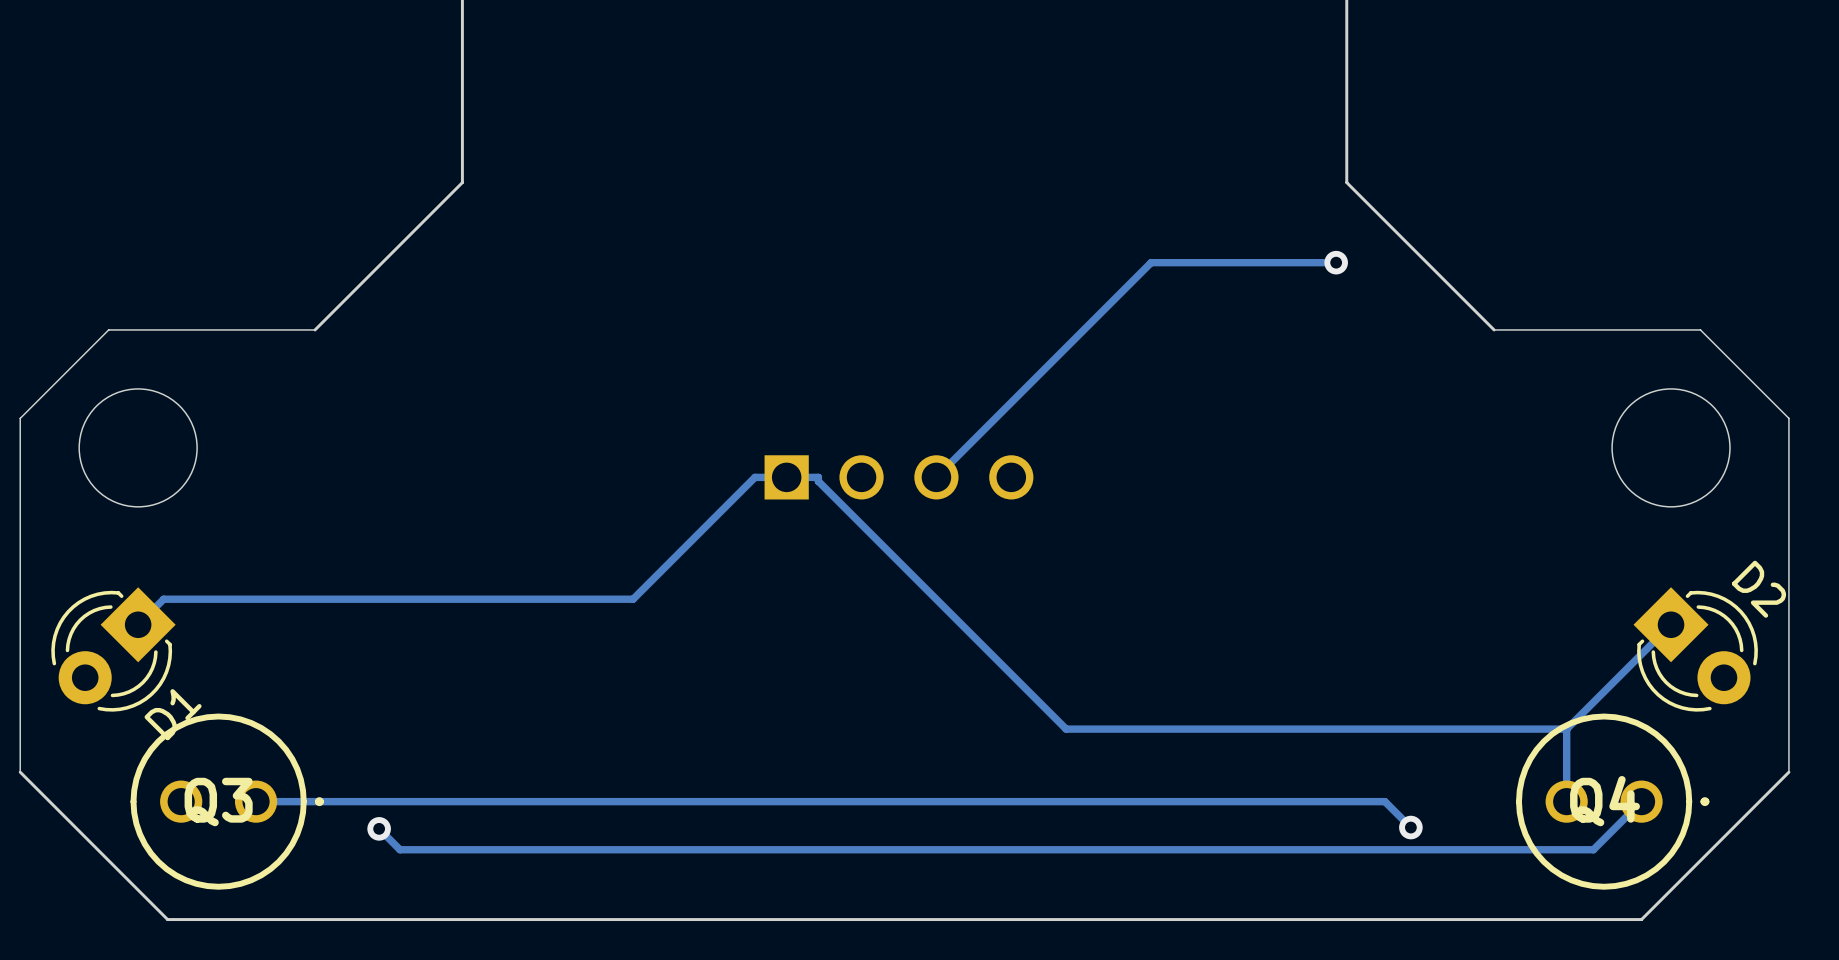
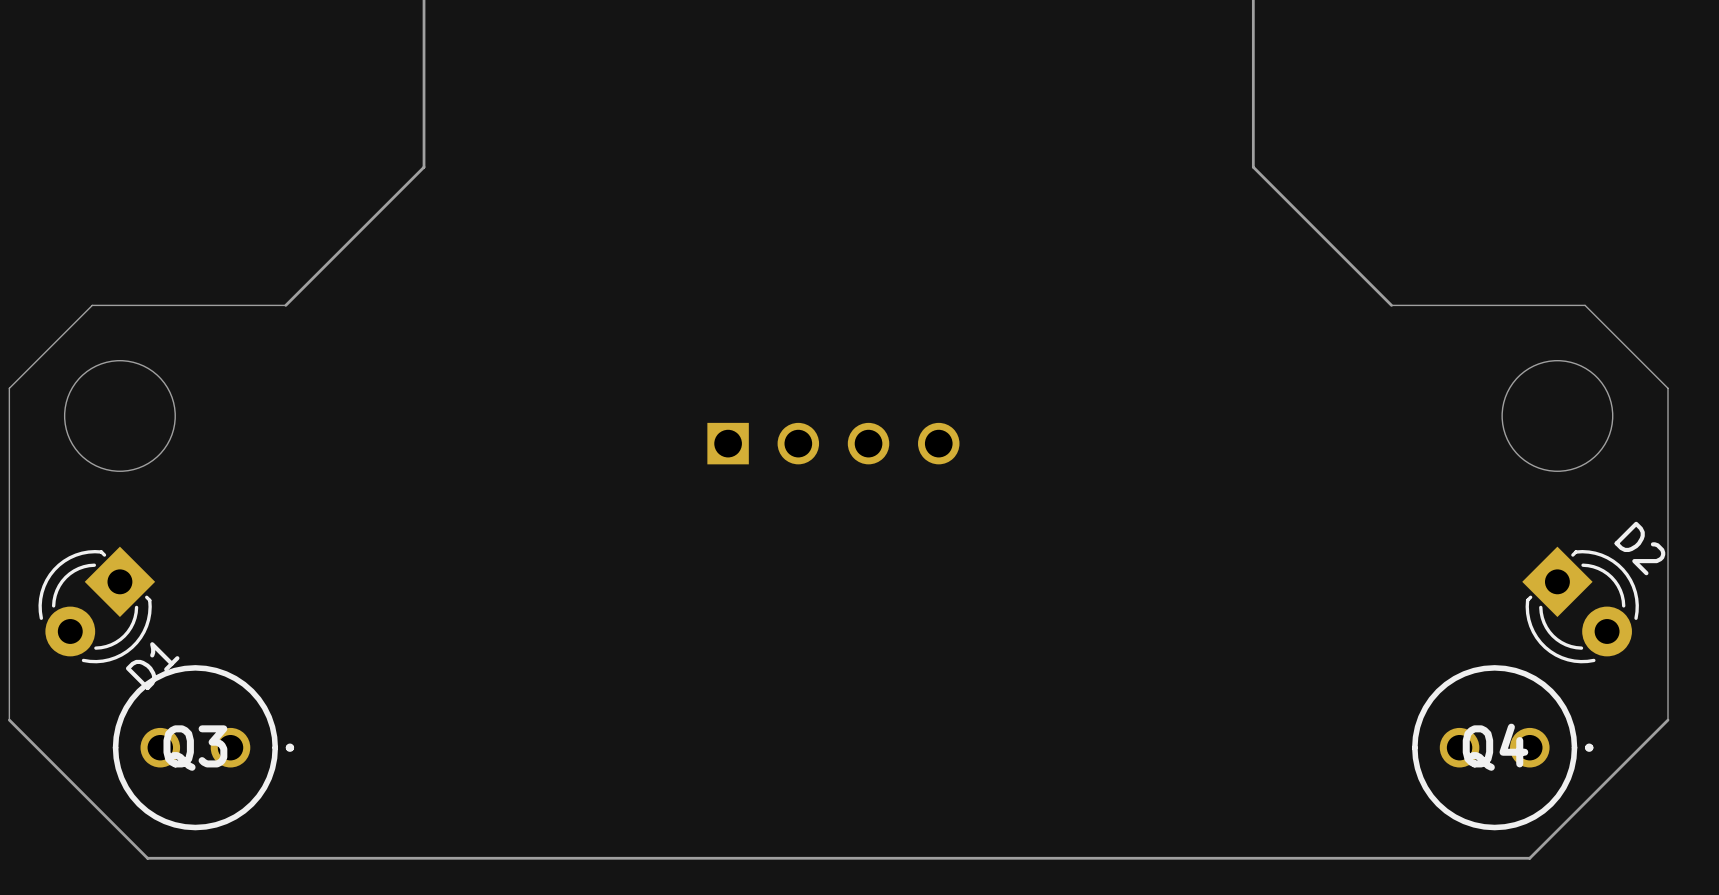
track: (1336, 262) (1151, 262) (936, 477) -> none
via: (1336, 262) -> none
track: (138, 624) (163, 599) (633, 599) (754, 477) (818, 477) (818, 481) (1066, 729) (1566, 729) -> none
track: (1671, 624) (1566, 729) -> none
track: (1566, 729) (1566, 801) -> none
track: (256, 801) (1384, 801) (1410, 827) -> none
track: (1641, 801) (1593, 849) (400, 849) (379, 828) -> none
via: (1410, 827) -> none
via: (379, 828) -> none

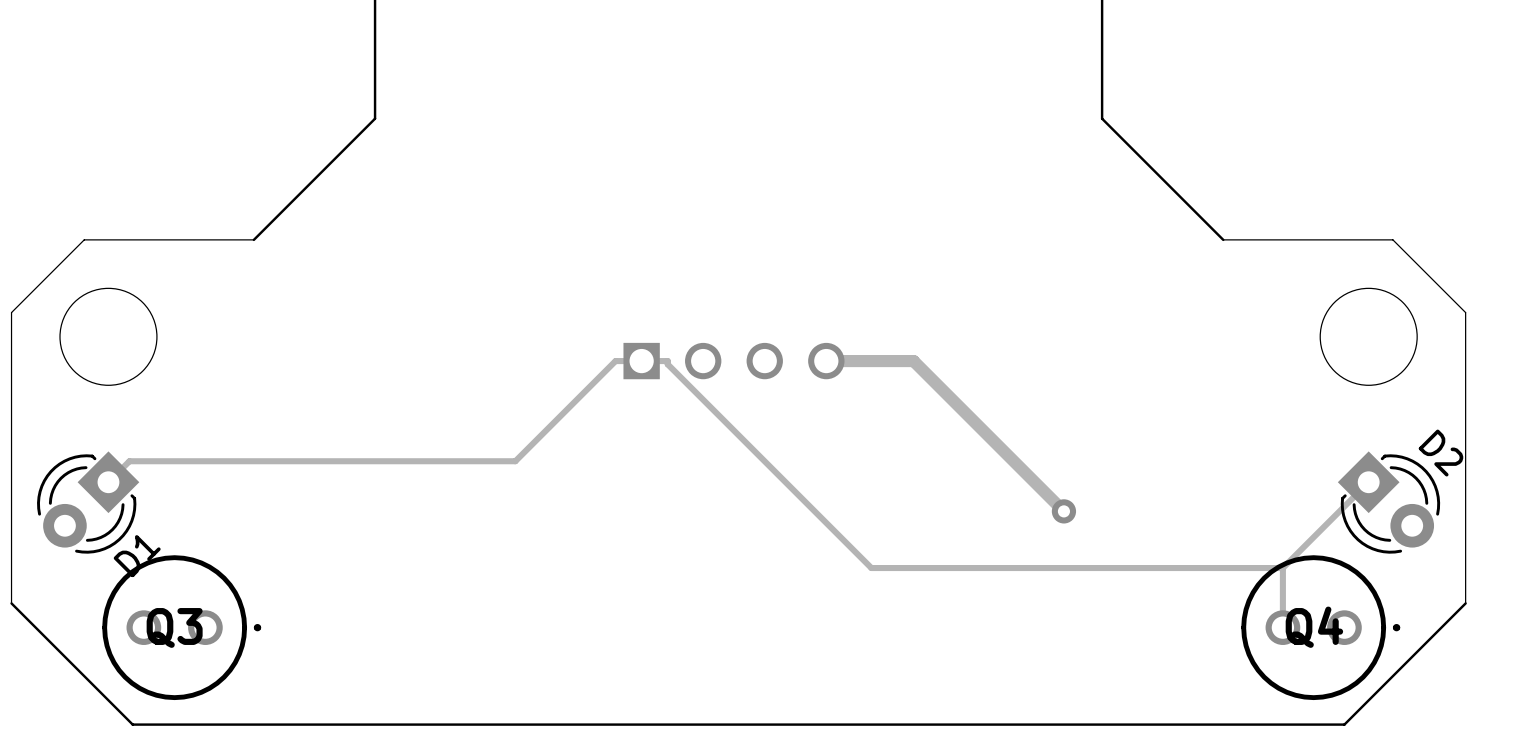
track: none -> (826, 361) (913, 361) (1063, 511)
track: none -> (108, 482) (129, 461) (515, 461) (615, 361) (667, 361) (667, 364) (871, 568) (1282, 568)
track: none -> (1368, 482) (1282, 568)
via: none -> (1063, 511)
track: none -> (1282, 568) (1282, 627)

